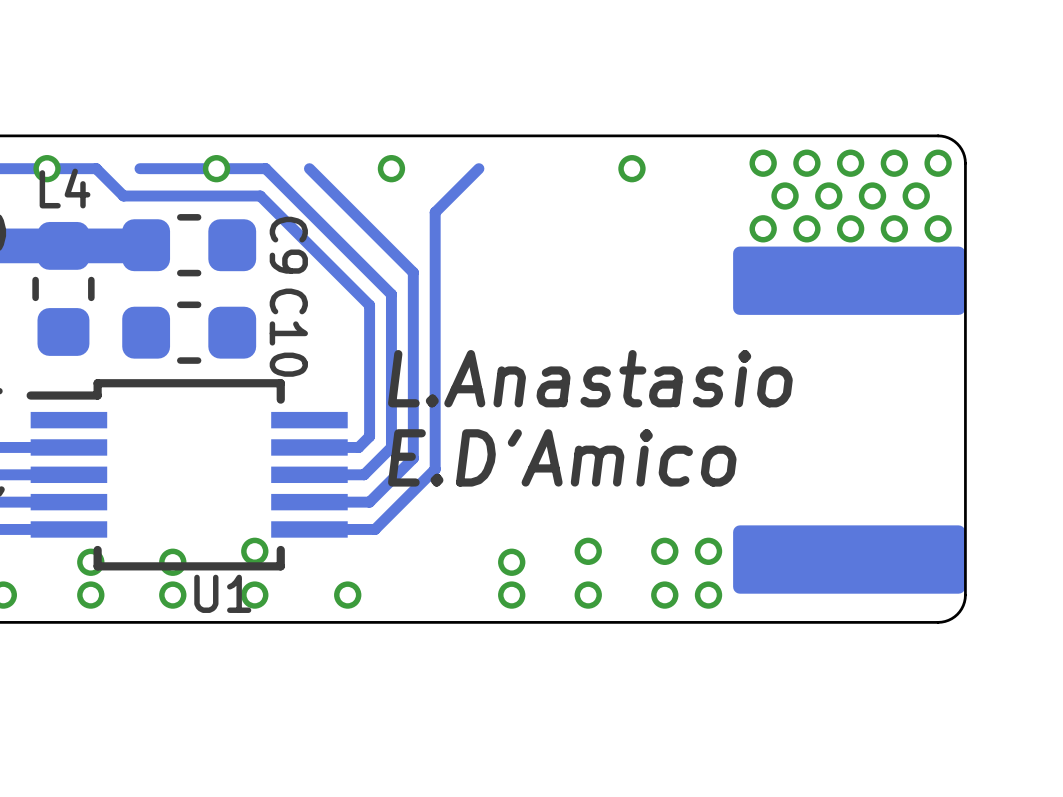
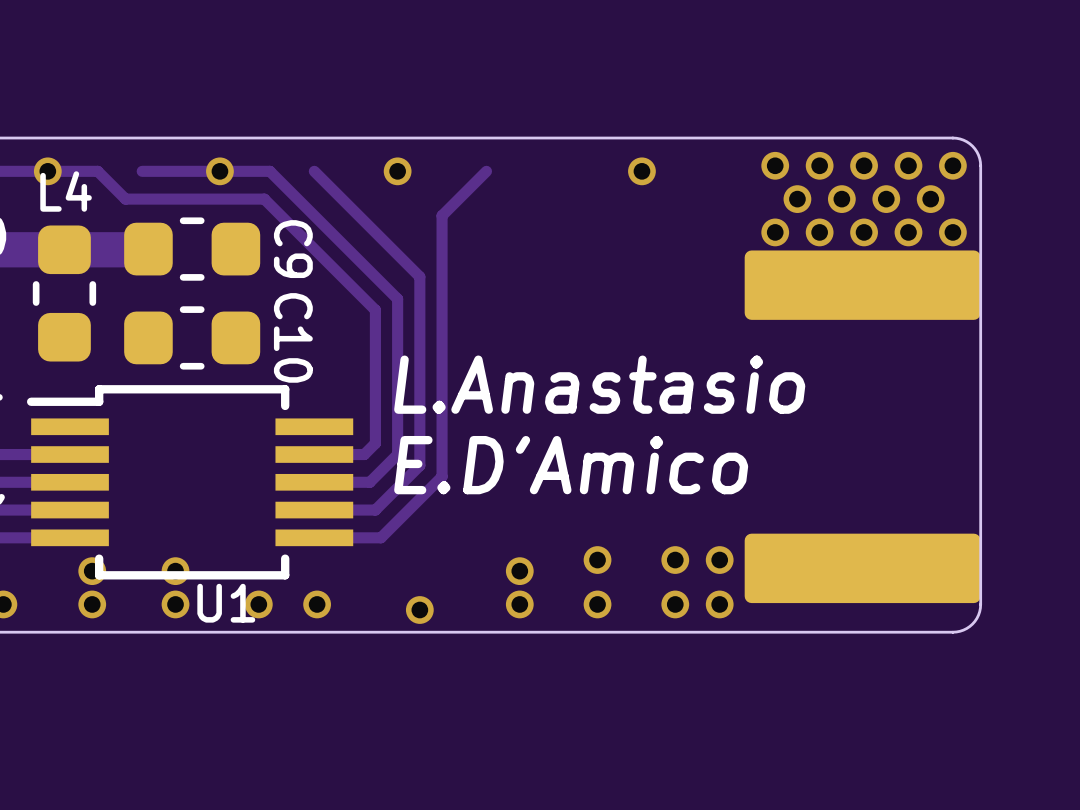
via: (254, 551) -> none
via: none -> (317, 604)
via: (347, 595) -> none
via: none -> (419, 610)

